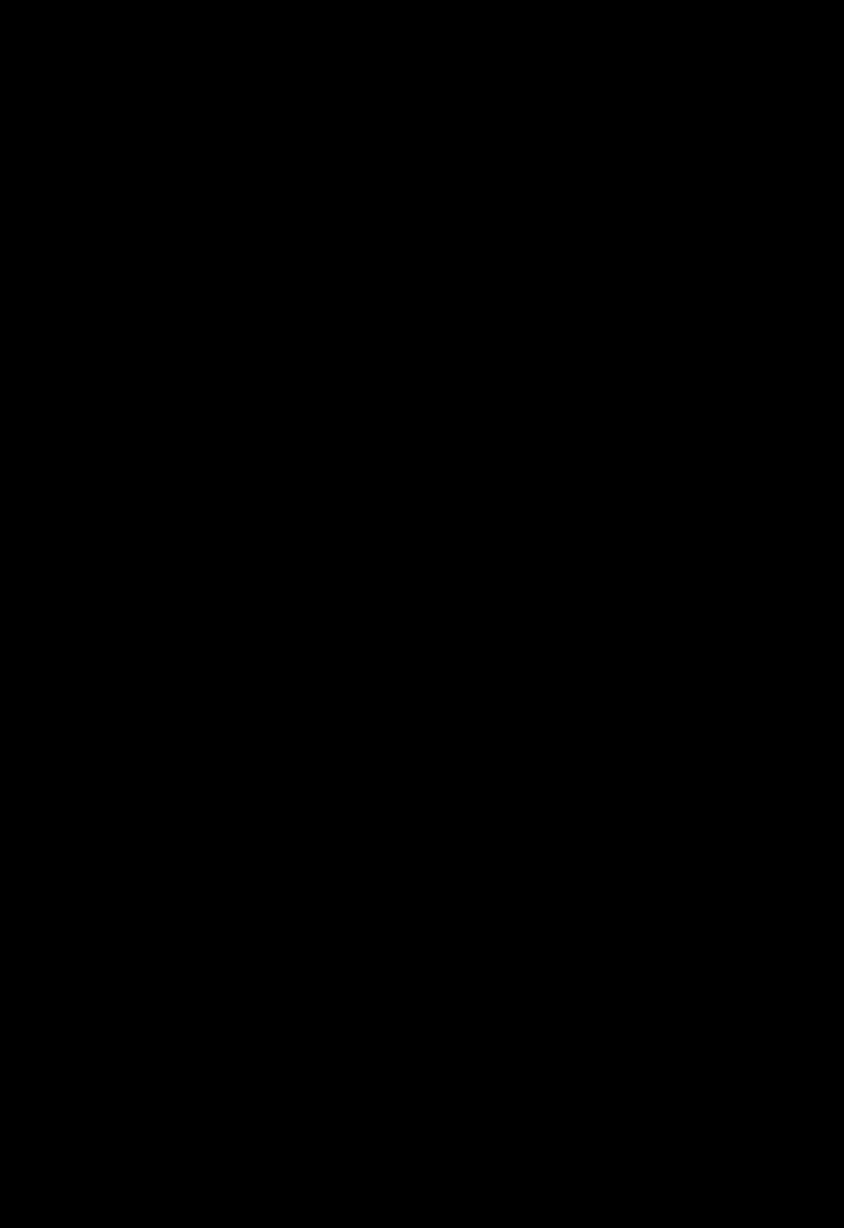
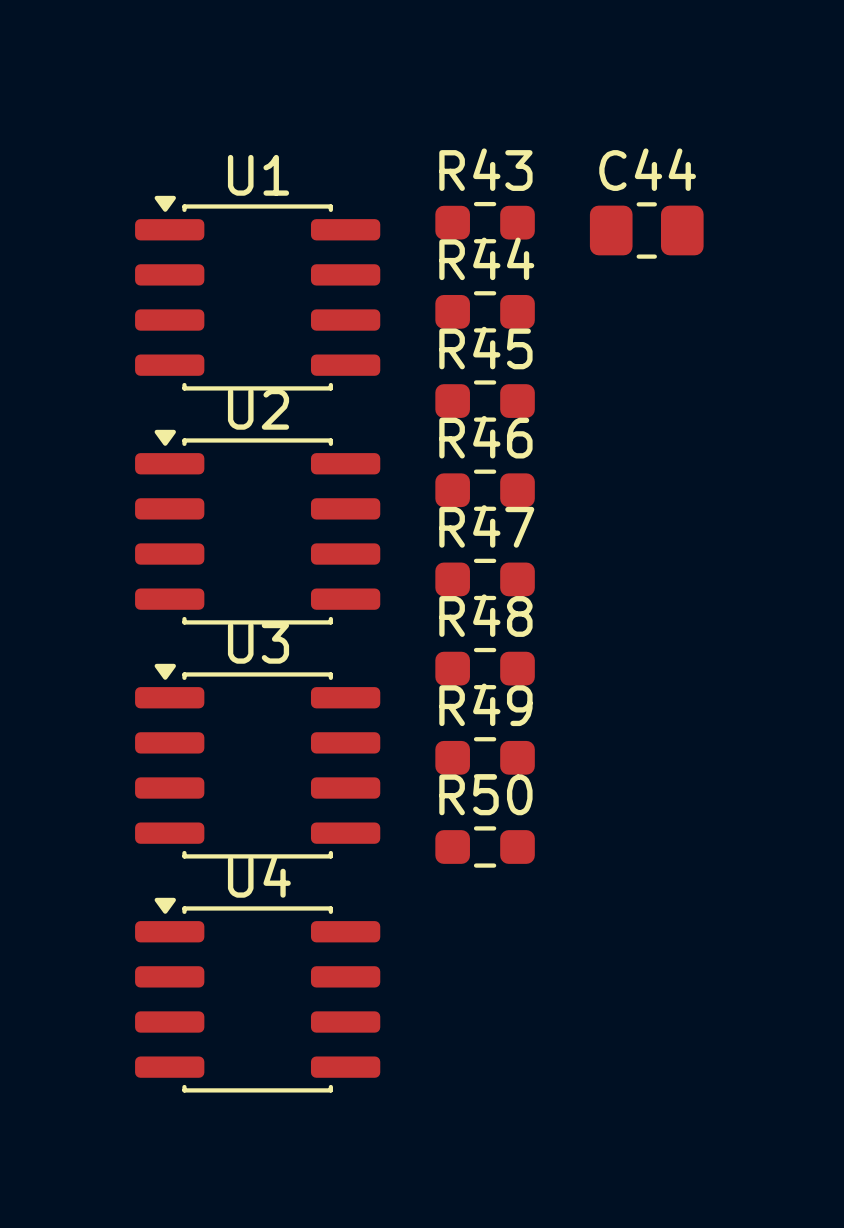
R43: none -> (485, 222)
C44: none -> (646, 230)
U1: none -> (257, 293)
R44: none -> (485, 311)
R45: none -> (485, 401)
R46: none -> (485, 490)
U2: none -> (257, 527)
R47: none -> (485, 579)
R48: none -> (485, 668)
R49: none -> (485, 757)
U3: none -> (257, 761)
R50: none -> (485, 846)
U4: none -> (257, 995)

